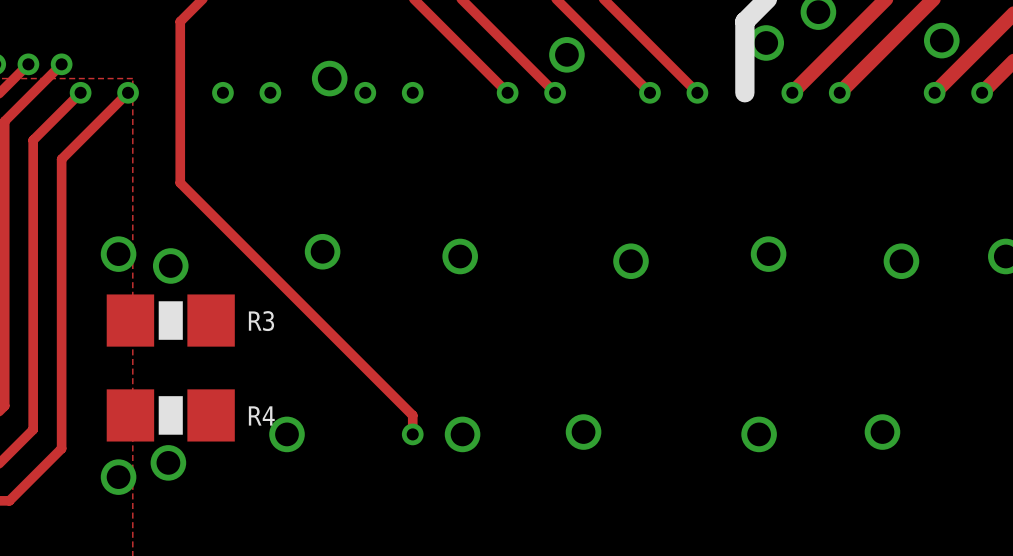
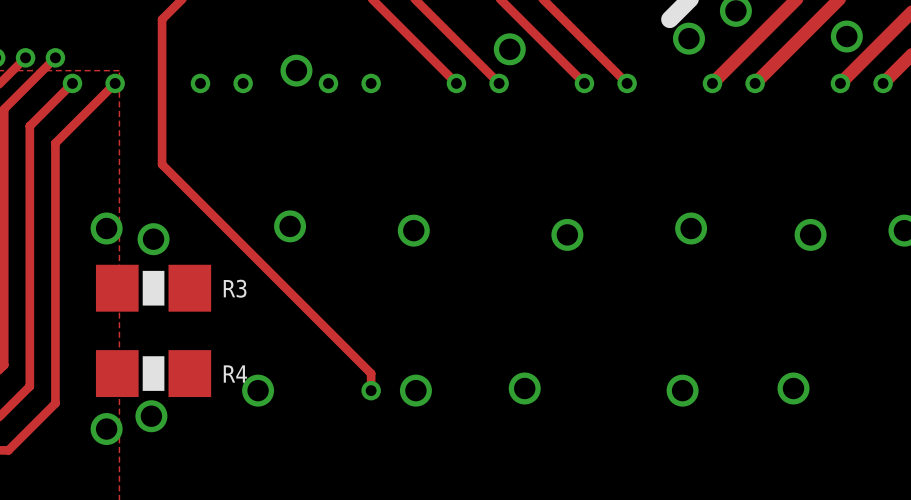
line: (744, 21) (744, 92) -> none

